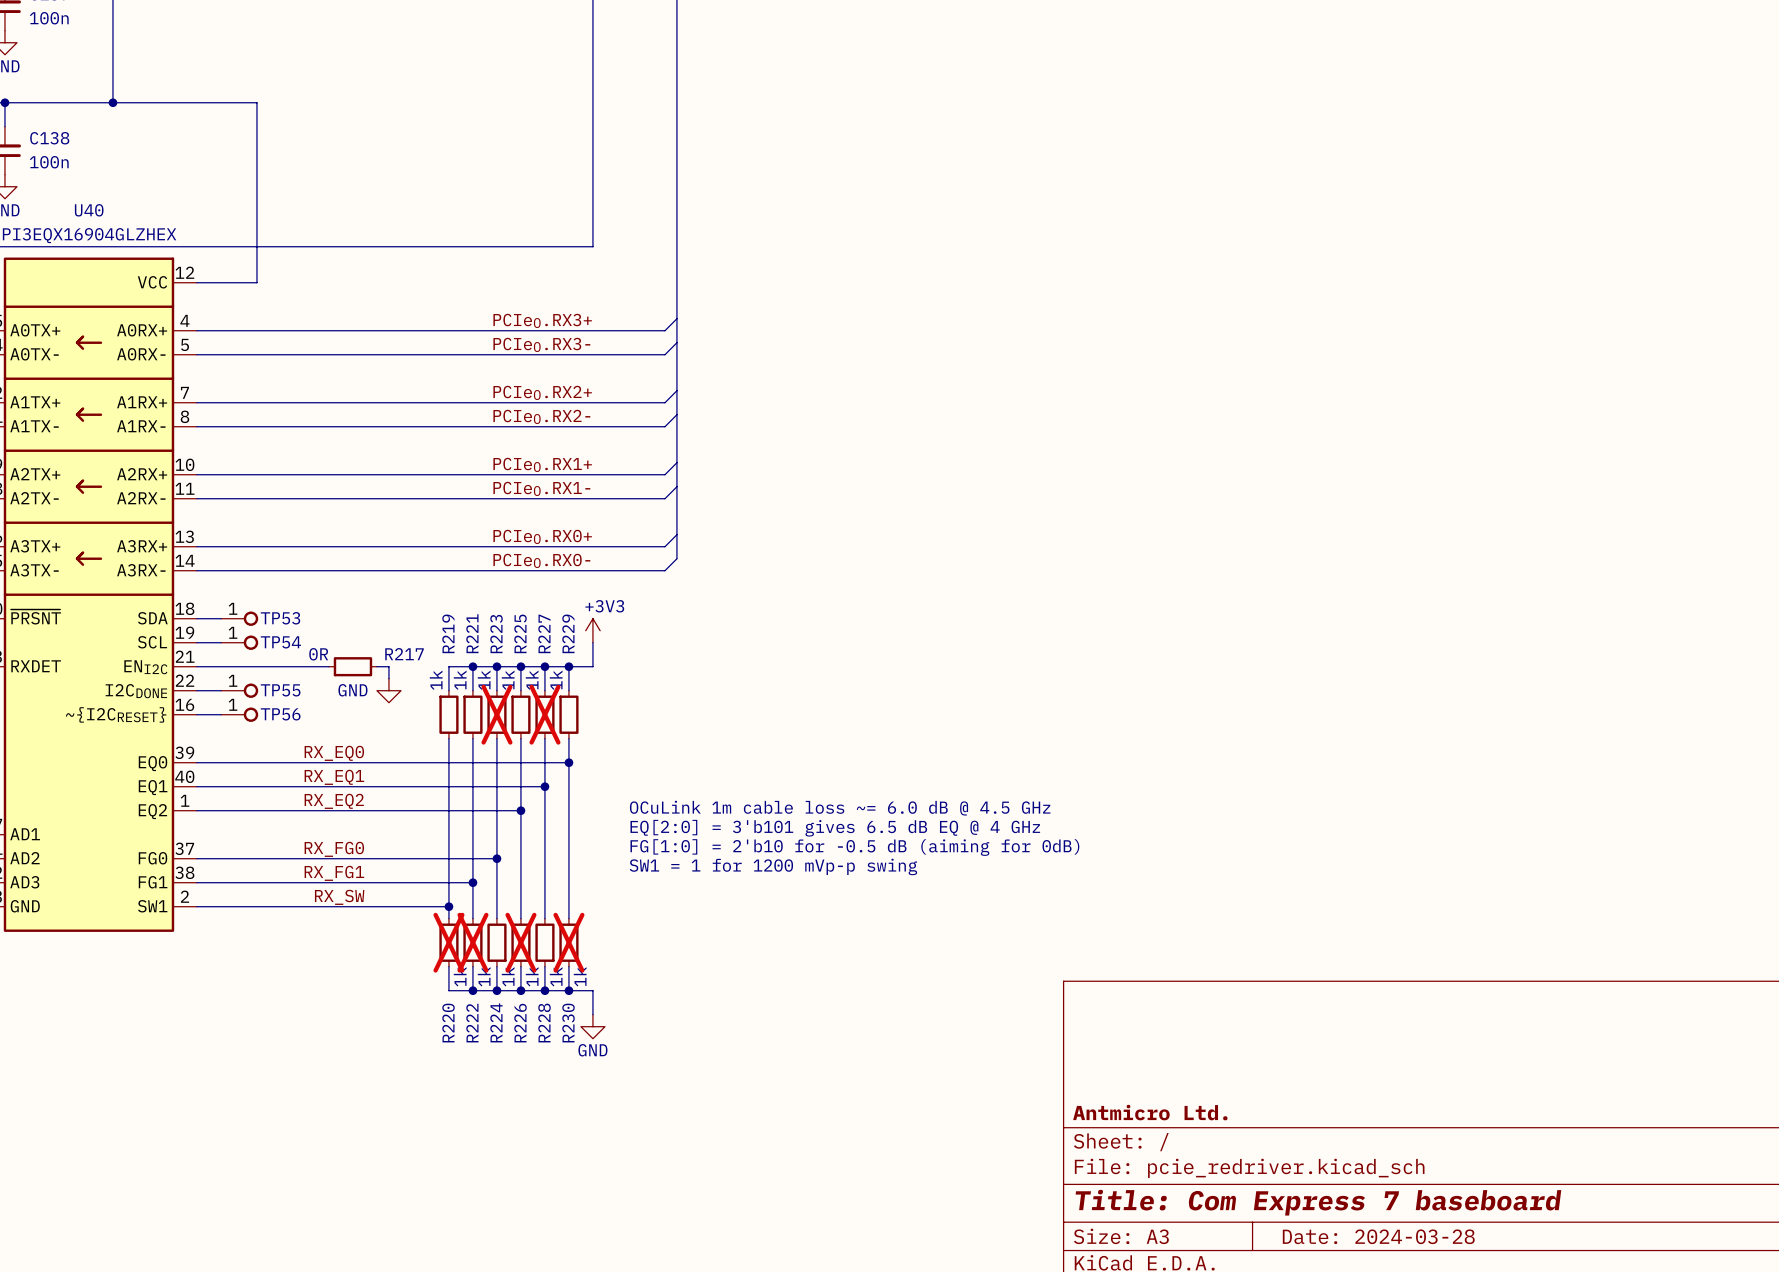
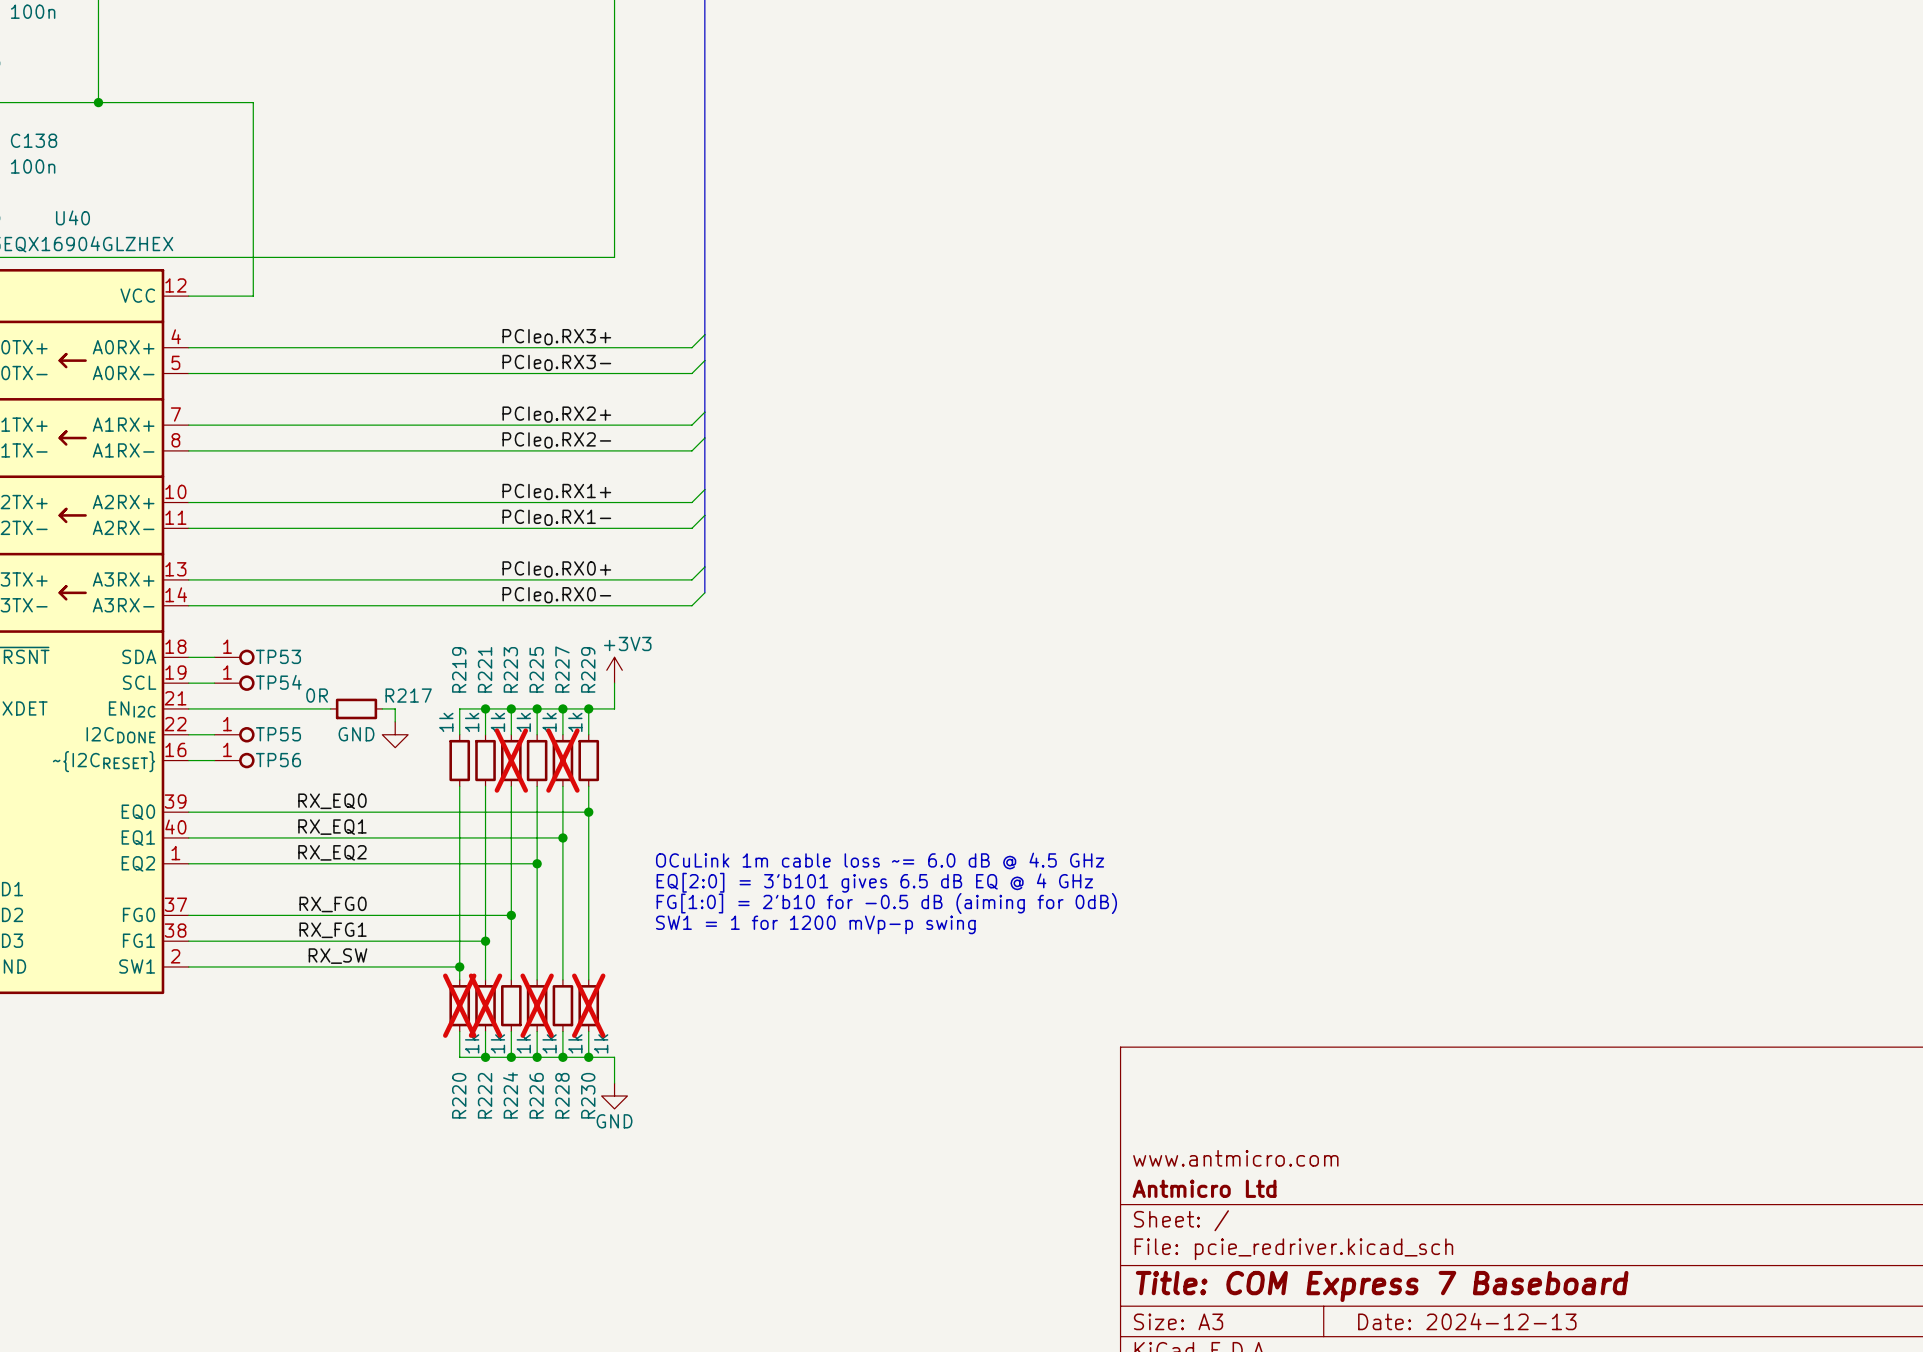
title block: none -> www.antmicro.com (1235, 1158)
title block: Antmicro Ltd. (1150, 1112) -> Antmicro Ltd (1204, 1188)
title block: Title: Com Express 7 baseboard (1318, 1202) -> Title: COM Express 7 Baseboard (1382, 1286)
title block: Date: 2024-03-28 (1378, 1236) -> Date: 2024-12-13 (1467, 1321)

